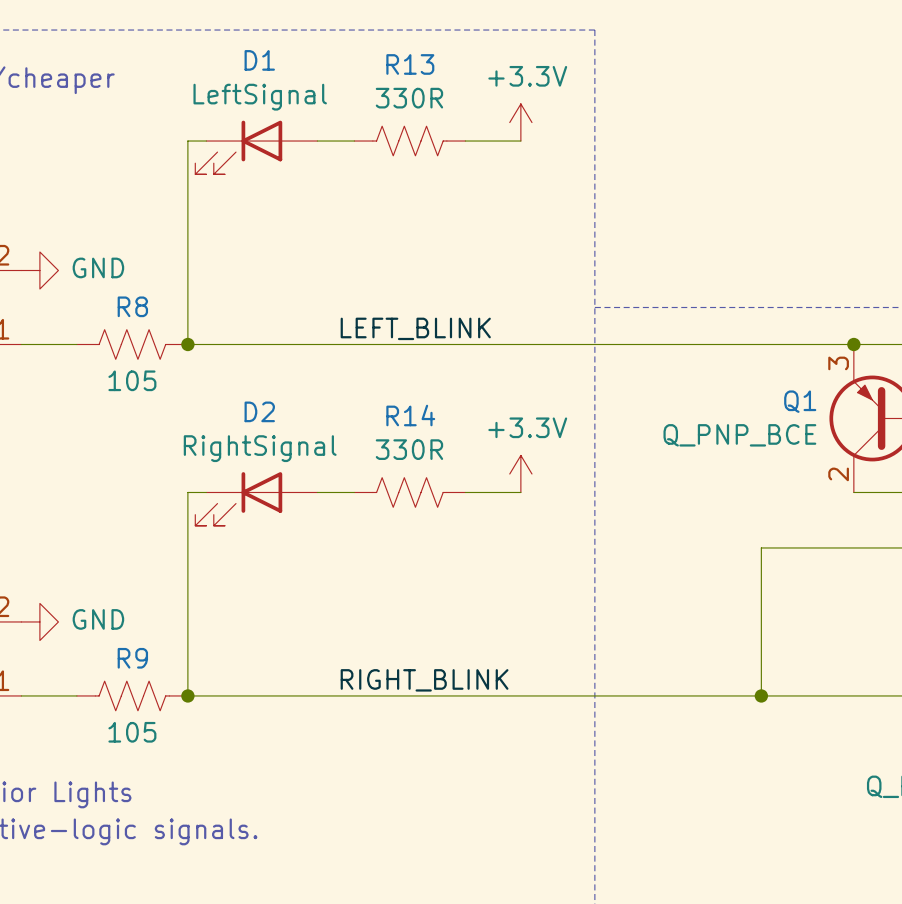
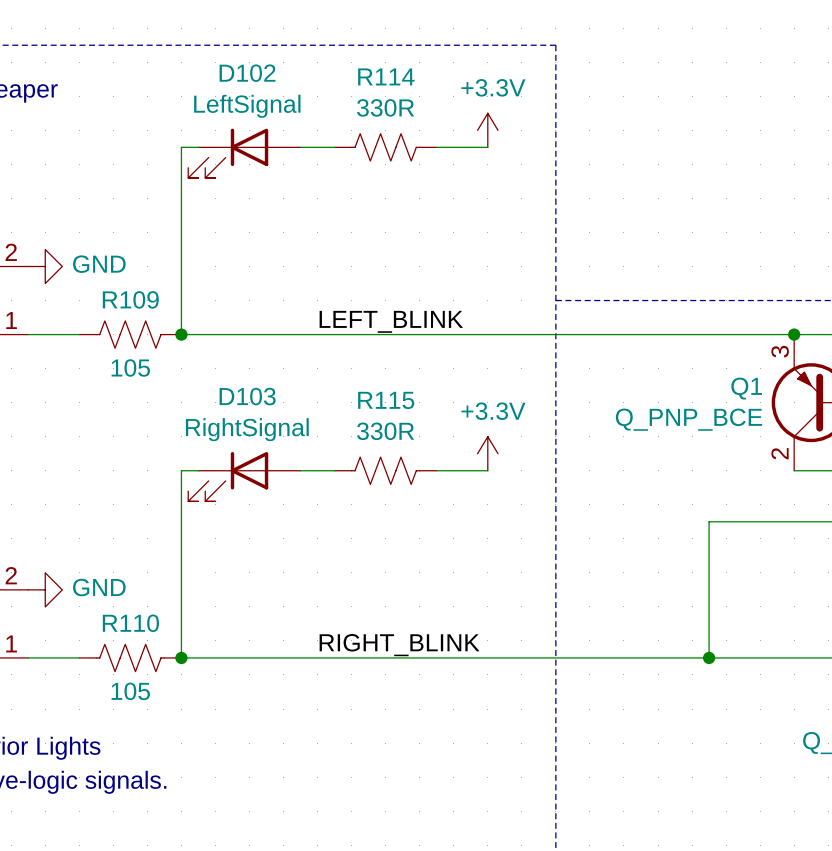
D1 name: D1 (259, 60) -> D102 (247, 73)
R13 name: R13 (410, 64) -> R114 (386, 76)
R8 name: R8 (132, 306) -> R109 (130, 299)
D2 name: D2 (259, 411) -> D103 (247, 396)
R14 name: R14 (410, 415) -> R115 (386, 400)
R9 name: R9 (132, 658) -> R110 (130, 623)

